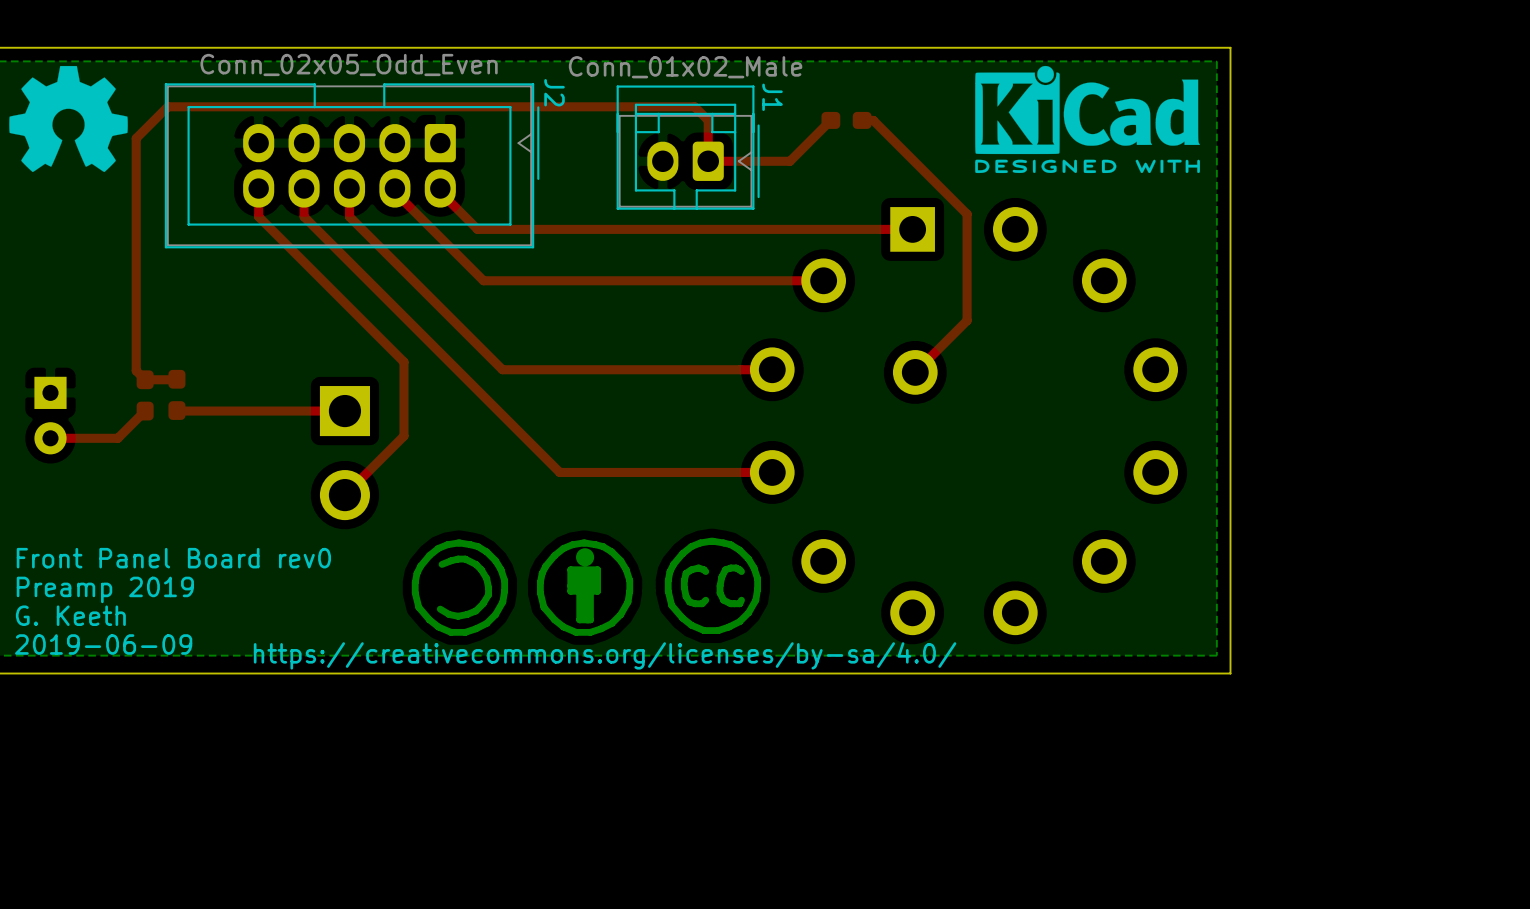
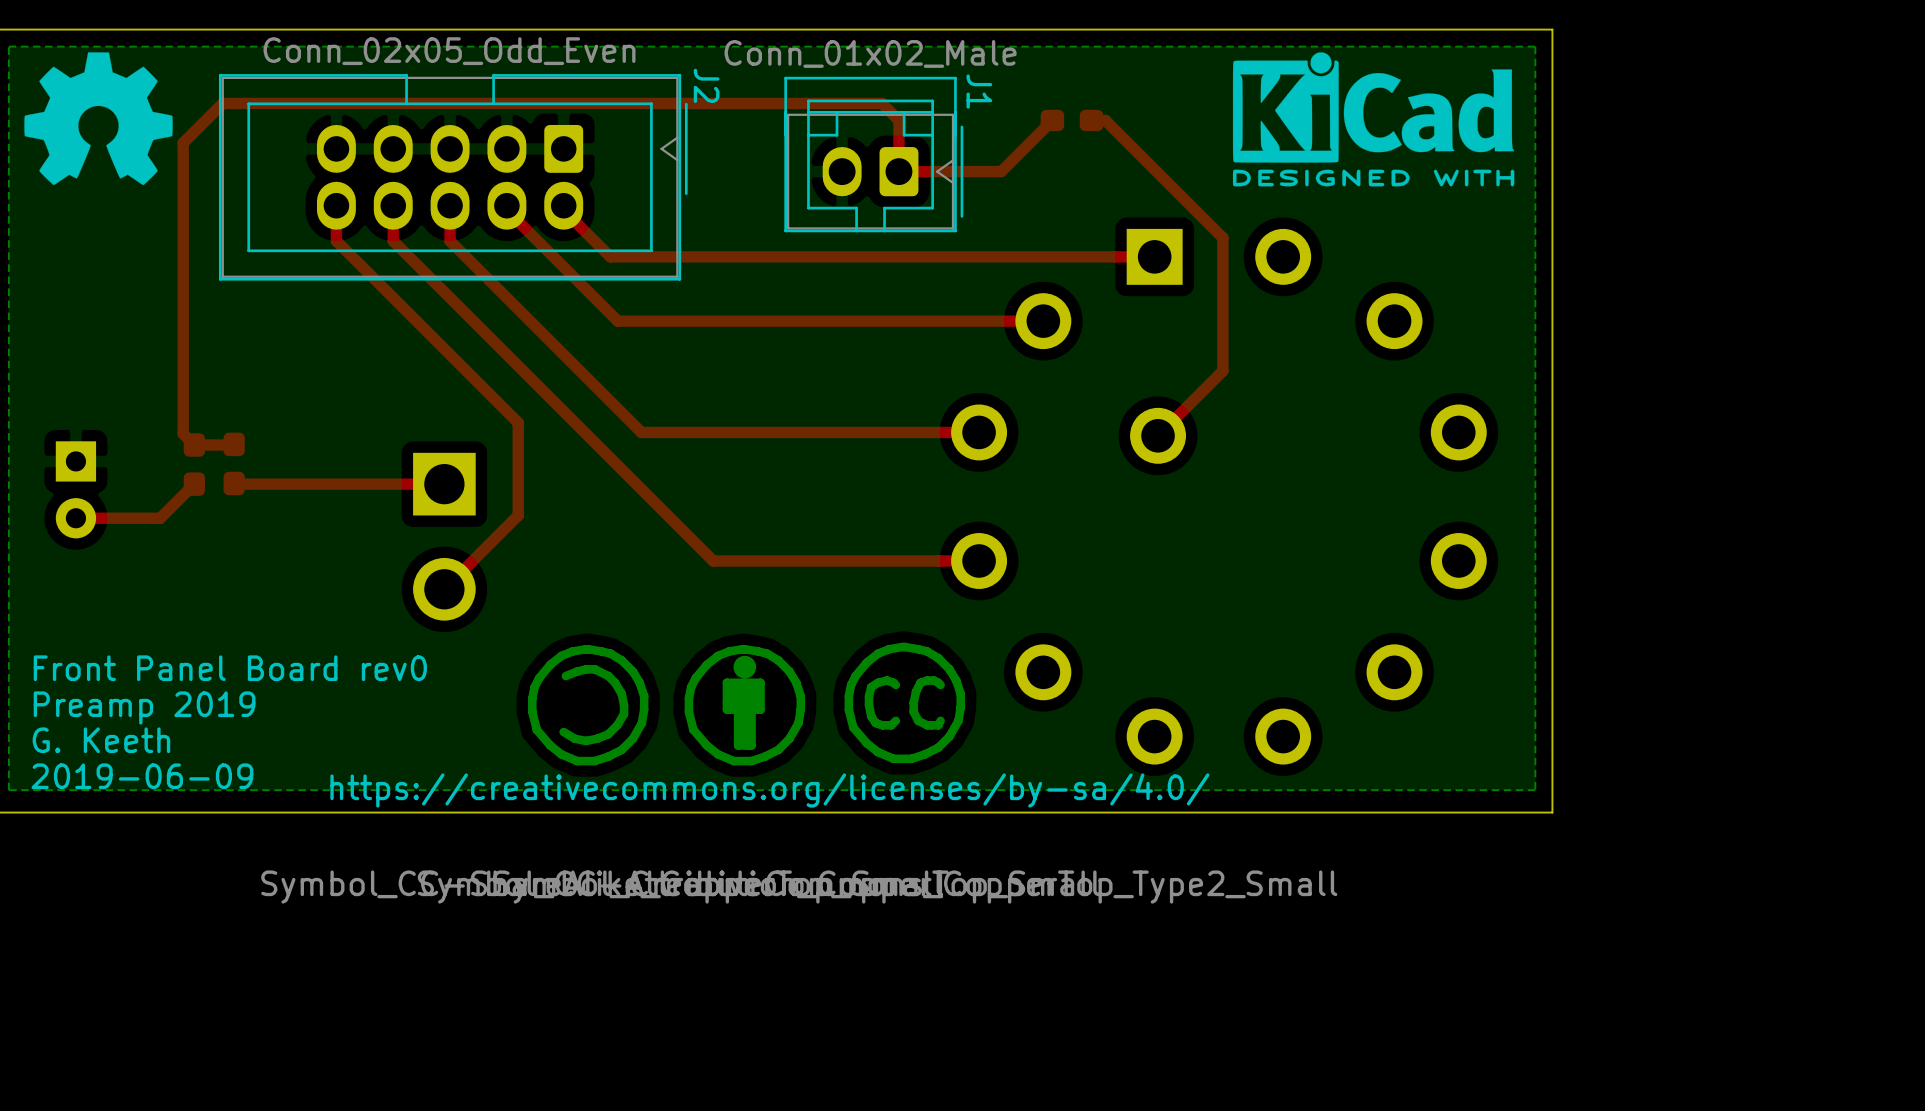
drawing shape: [664, 537, 762, 634] -> [493, 642, 1338, 904]
drawing shape: [411, 539, 509, 636] -> [261, 644, 944, 904]
drawing shape: [536, 539, 634, 636] -> [417, 644, 1100, 904]

